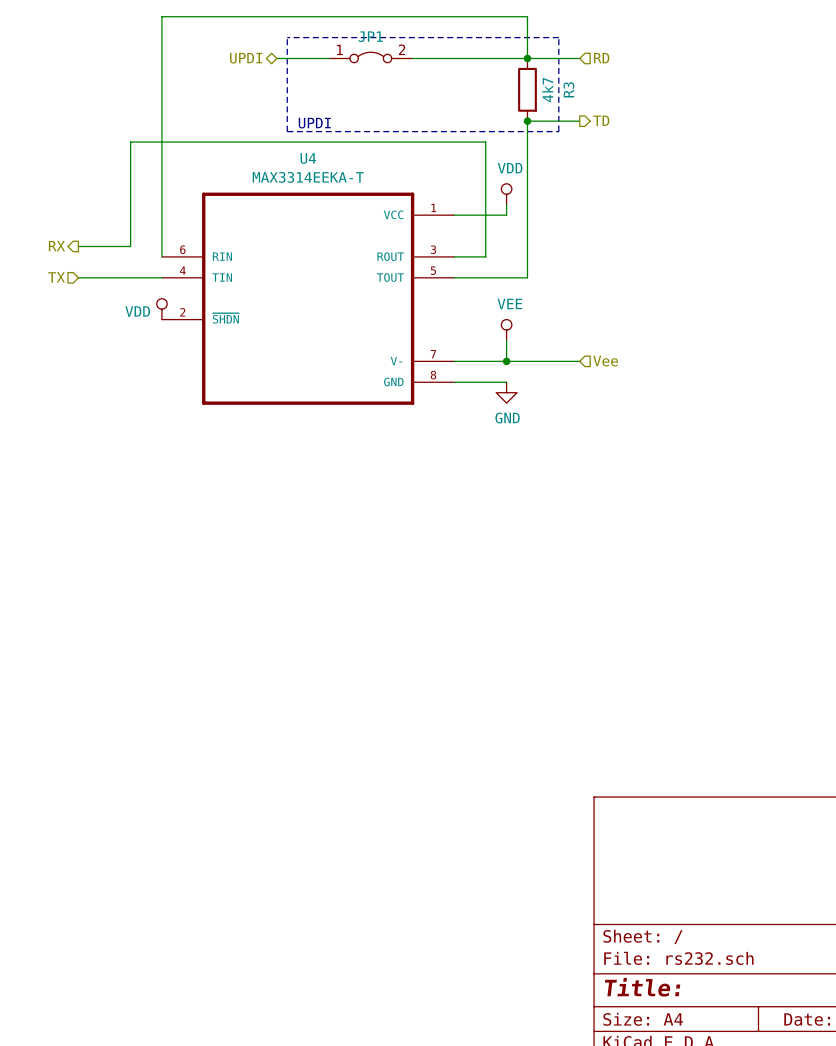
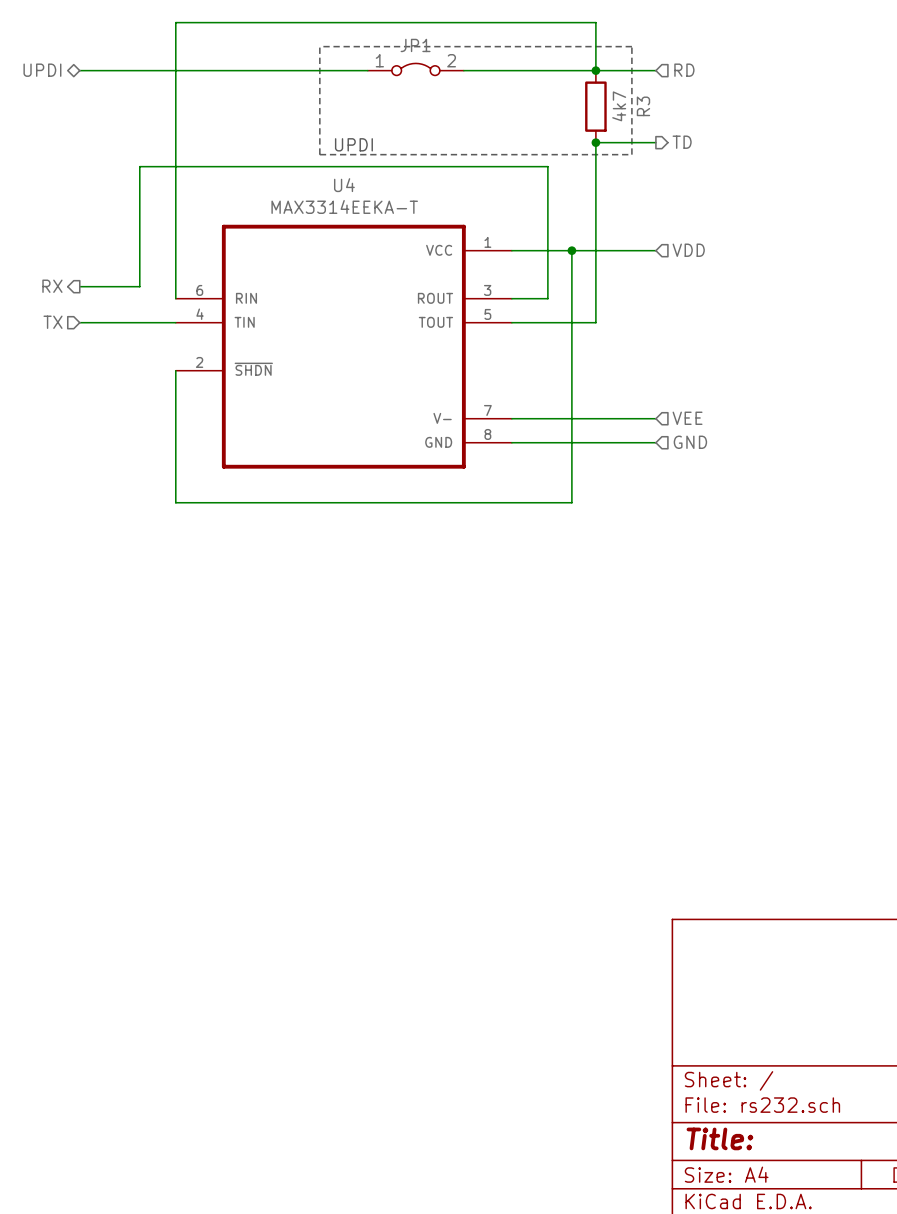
wire: none -> (79, 70) (307, 70)
hierarchical label position: UPDI (246, 58) -> UPDI (42, 70)
power symbol: VDD (506, 194) -> none
wire: (506, 204) (506, 215) -> none
hierarchical label: none -> VDD (688, 250)
junction: none -> (571, 250)
wire: none -> (655, 250) (571, 250) (571, 394)
power symbol: VDD (161, 309) -> none
wire: none -> (175, 370) (175, 502) (571, 502) (571, 418)
power symbol: VEE (506, 330) -> none
junction: (506, 361) -> none
hierarchical label: Vee (605, 361) -> VEE (687, 418)
hierarchical label: none -> GND (690, 442)
wire: none -> (571, 442) (655, 442)
power symbol: GND (506, 392) -> none

